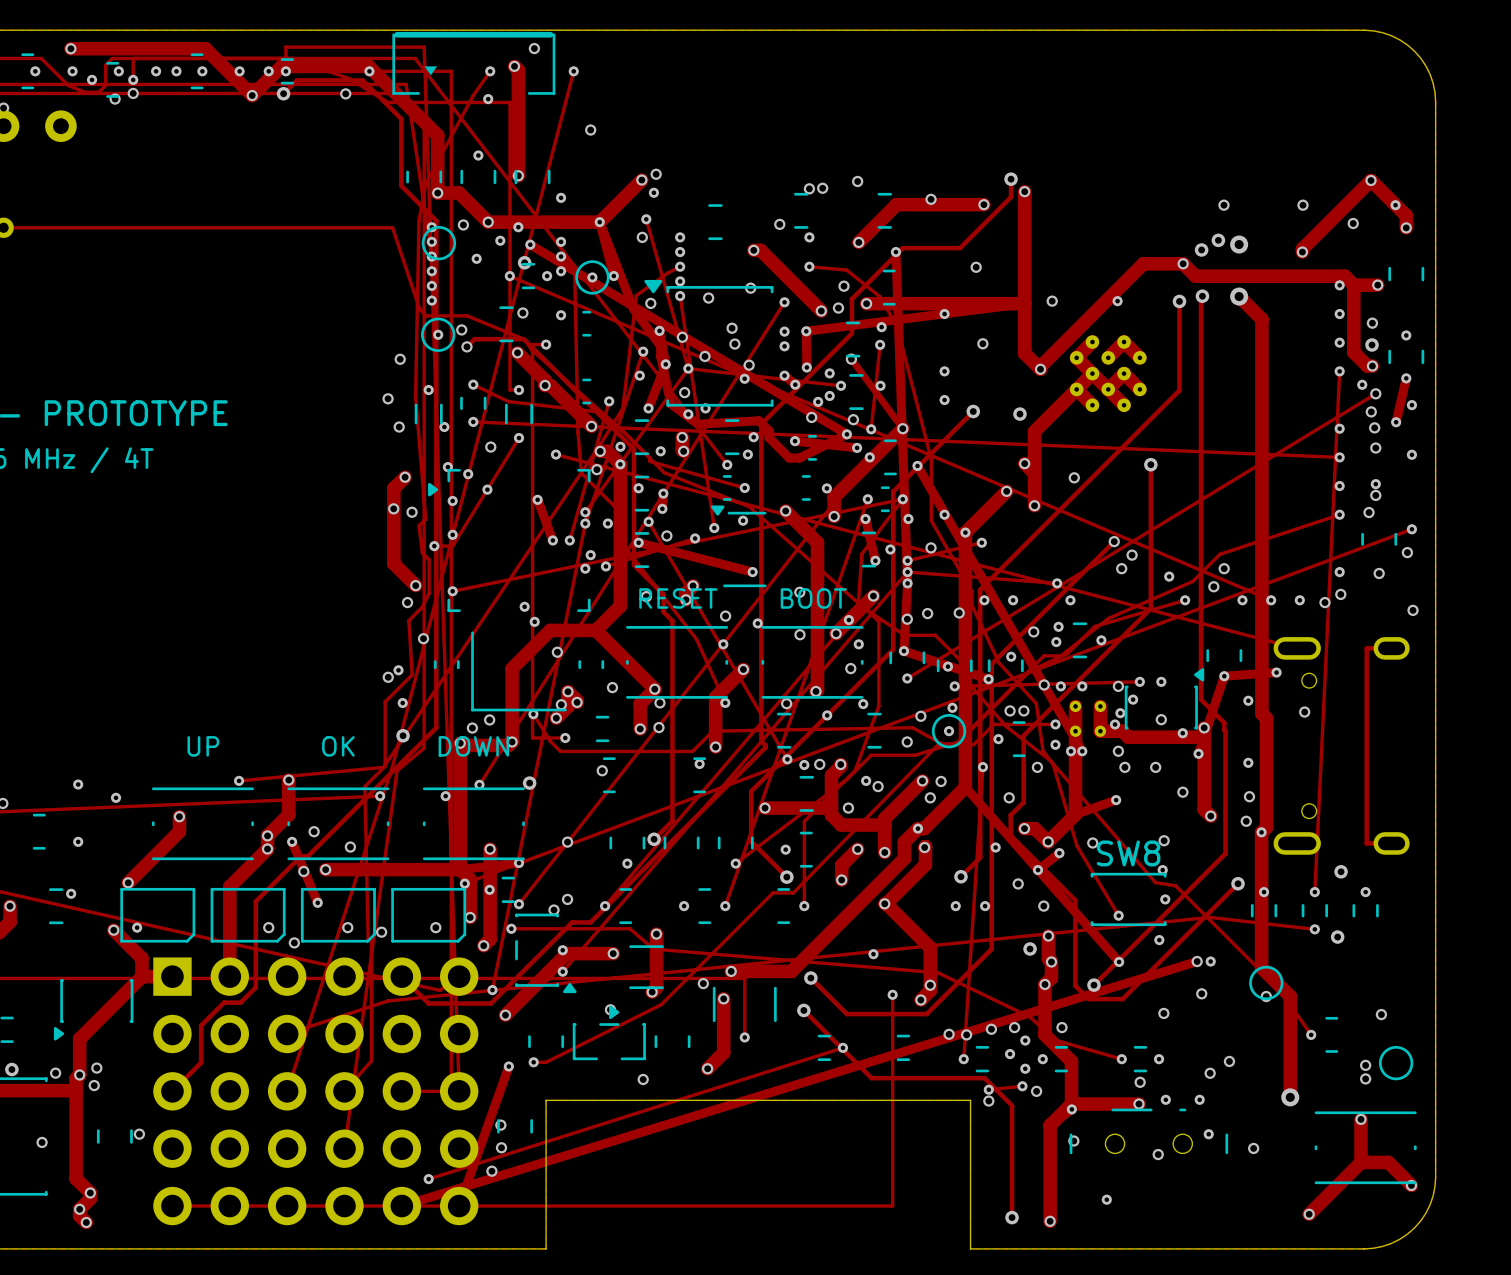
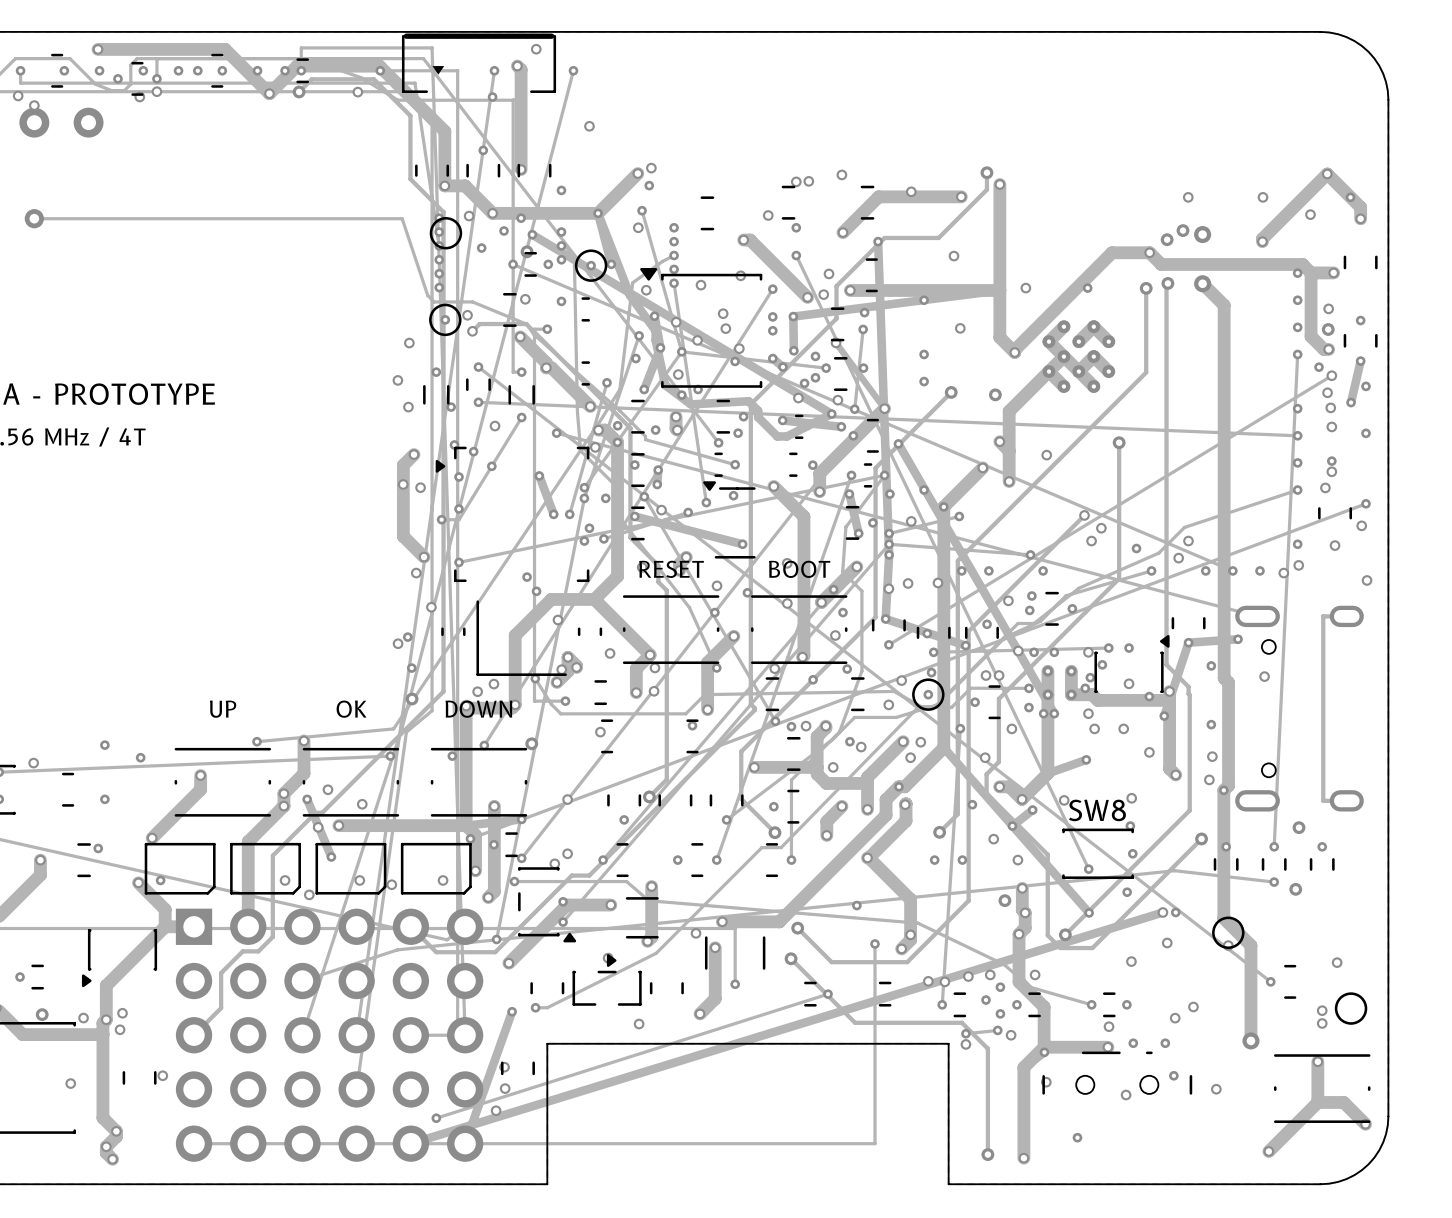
track: (490, 71) (473, 95) (425, 183) (418, 221) (415, 397) (425, 519) (418, 525) (422, 552) (429, 559) (429, 593) (422, 607) (408, 620) (412, 674) (385, 701) (385, 766) (364, 786) (368, 938) (371, 942) (371, 1060) (344, 1091) -> (494, 70) (356, 1035)
track: (809, 266) (846, 270) (880, 297) (897, 327) (931, 459) (931, 520) (971, 591) (971, 605) (999, 662) (1036, 703) (1043, 750) (1053, 764) (1076, 845) (1118, 915) -> (796, 255) (1088, 869)
track: (473, 384) (508, 401) (596, 411) (623, 432) (664, 472) (749, 506) (864, 608) (904, 635) (935, 635) (962, 662) (962, 675) (1006, 726) (1050, 760) (1155, 882) (1175, 885) (1280, 990) (1311, 1034) -> (478, 367) (1270, 981)

